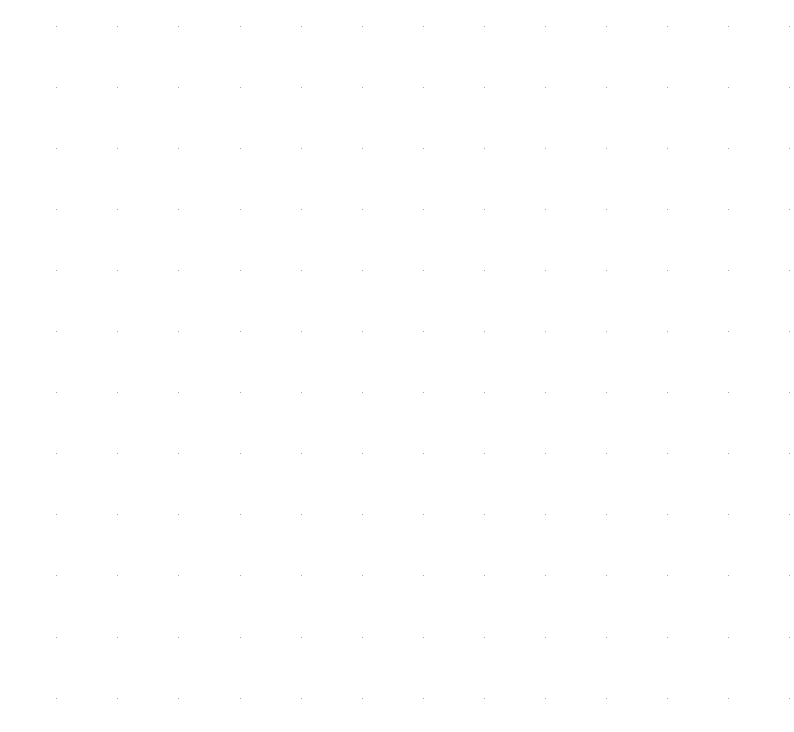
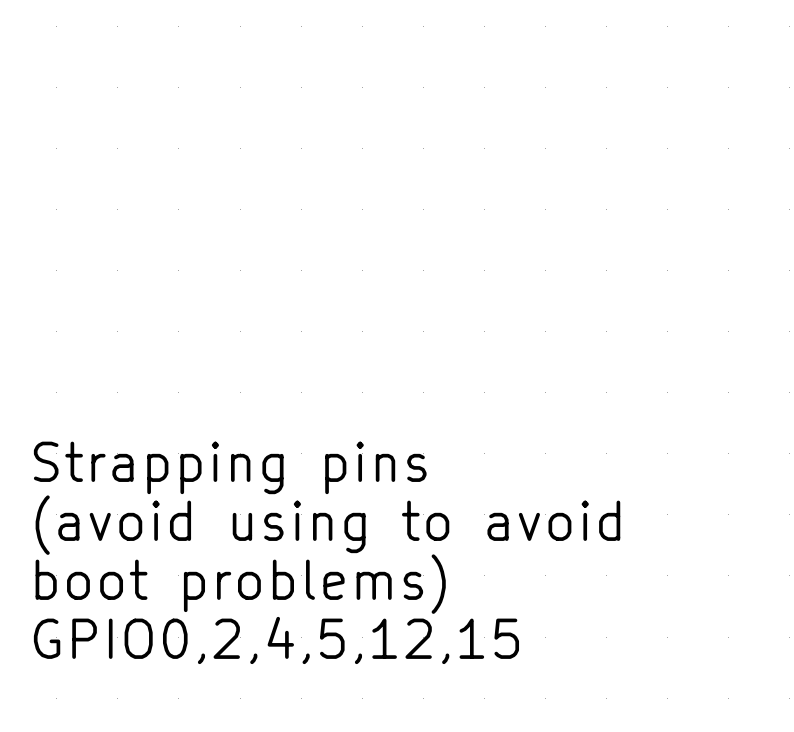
text: none -> Strapping pins (230, 467)
text: none -> (avoid using to avoid (327, 525)
text: none -> boot problems) (240, 584)
text: none -> GPIO0,2,4,5,12,15 (276, 640)

